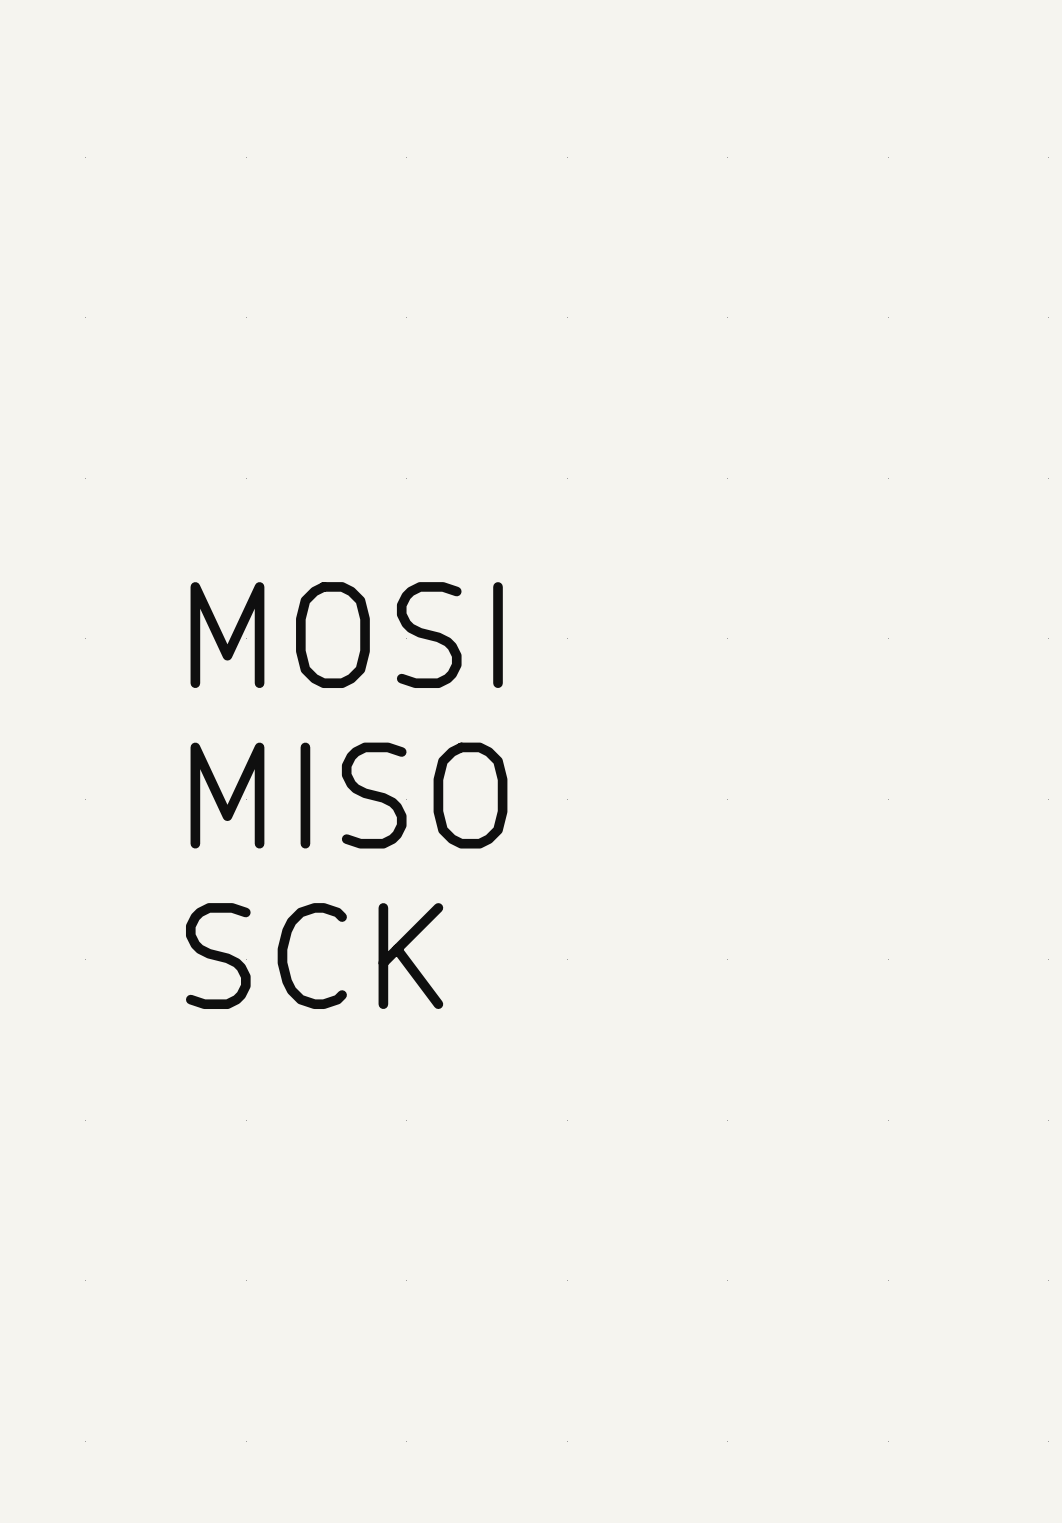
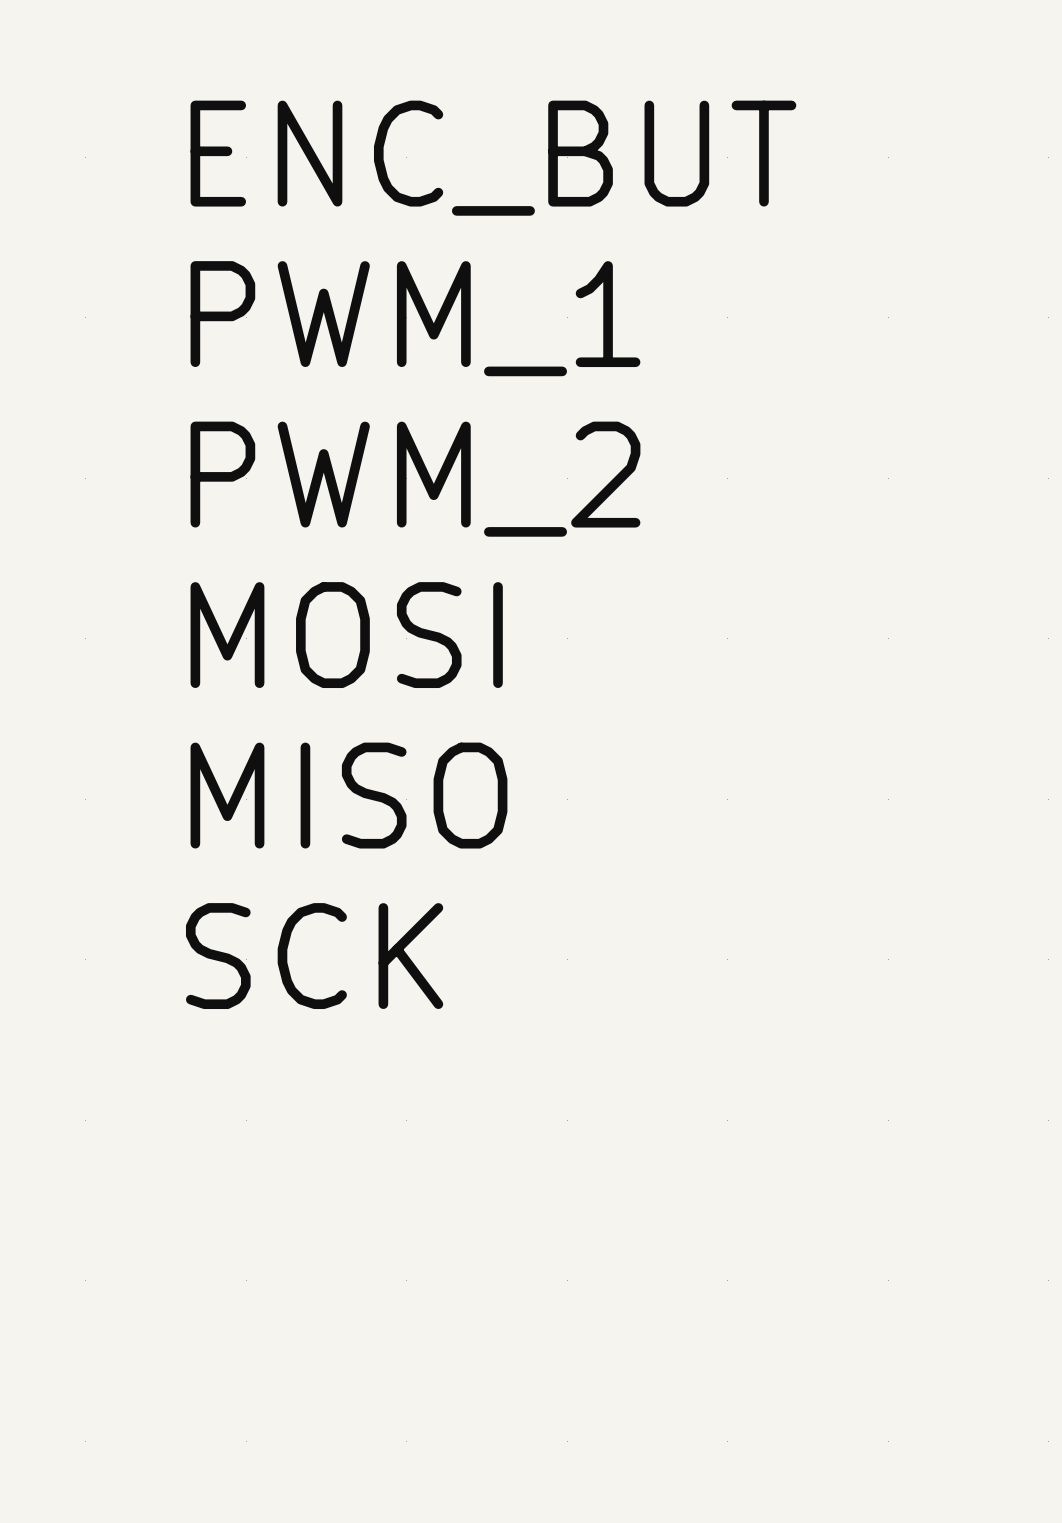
label: none -> ENC_BUT (493, 158)
label: none -> PWM_1 (415, 318)
label: none -> PWM_2 (415, 479)

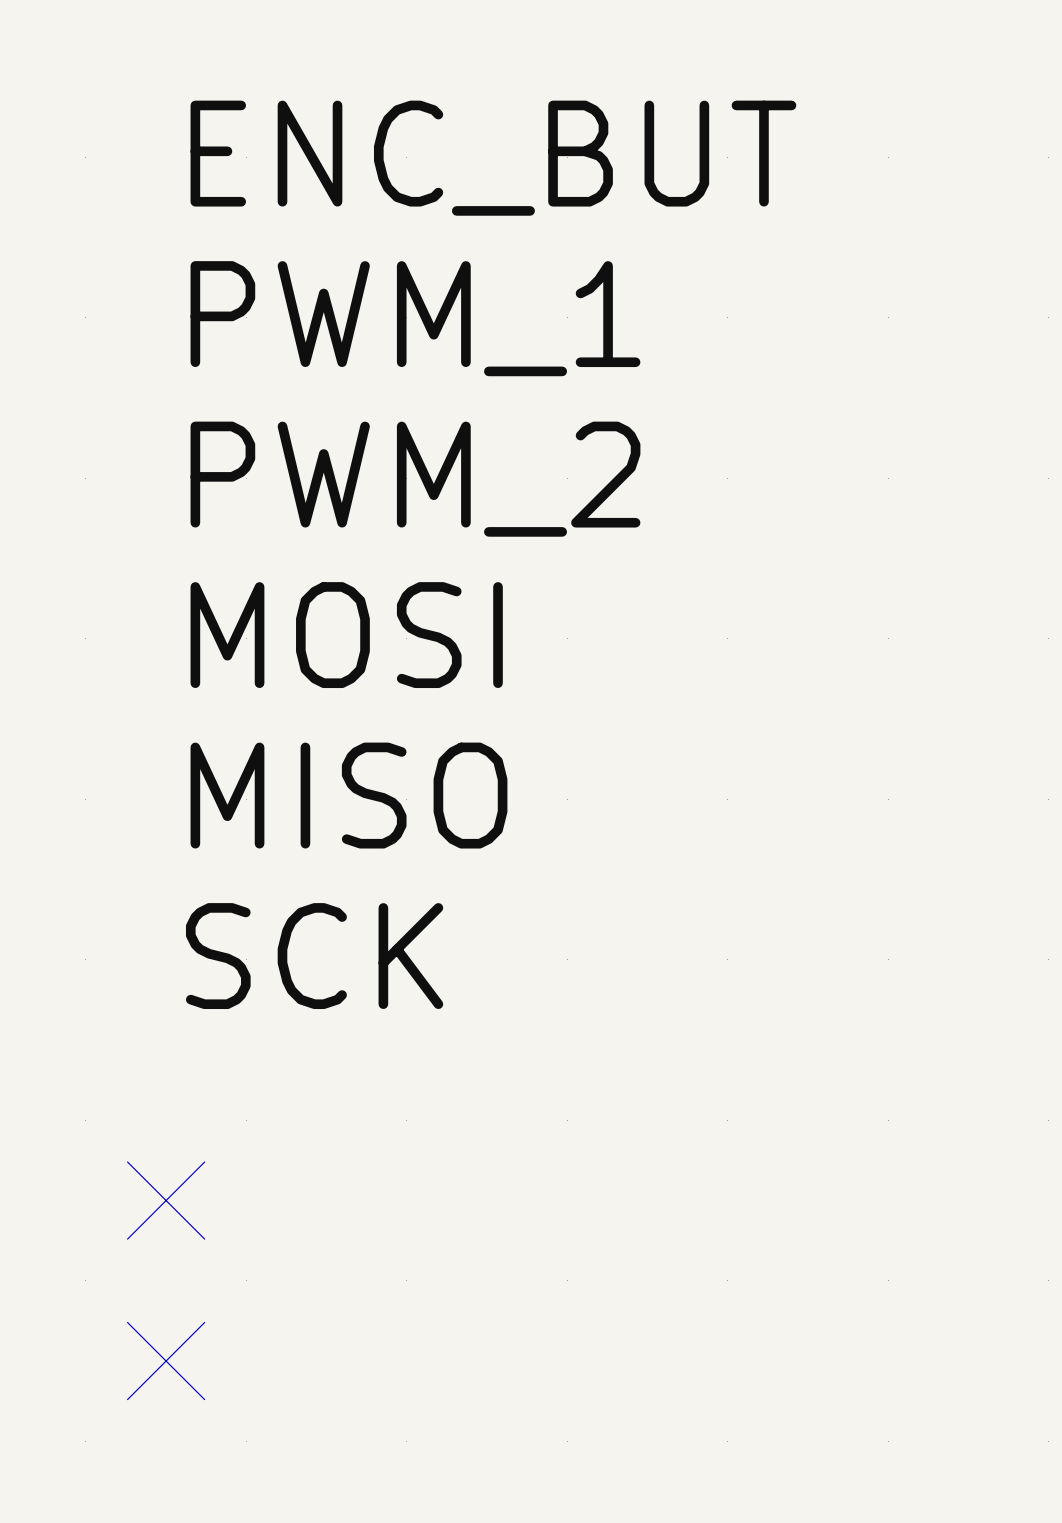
no-connect mark: none -> (166, 1200)
no-connect mark: none -> (166, 1361)

